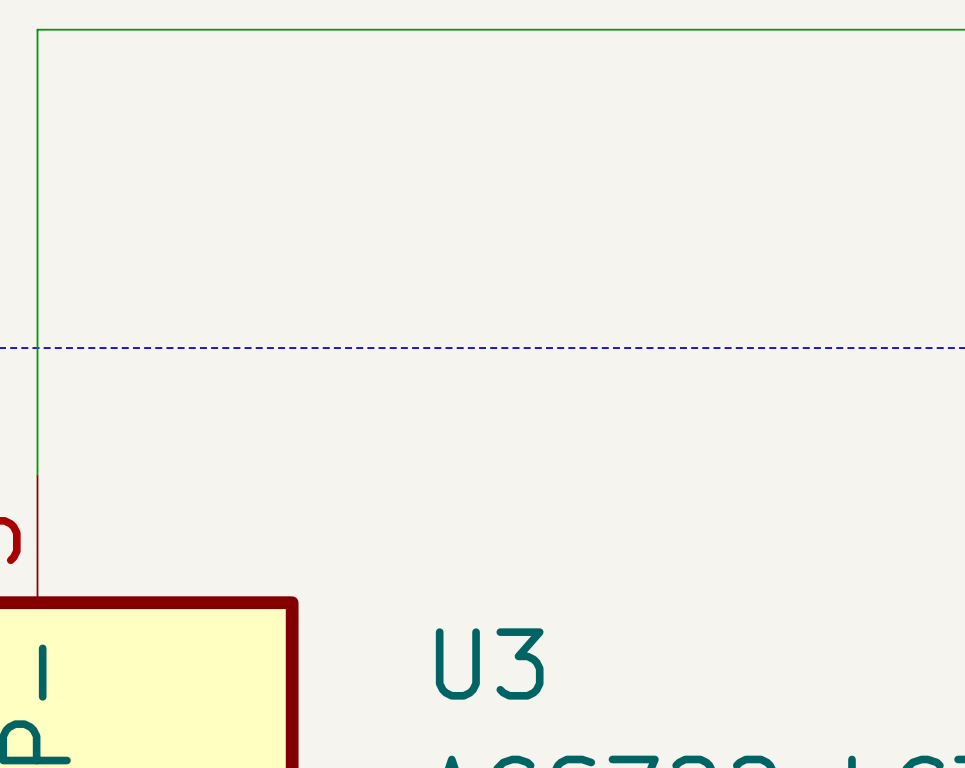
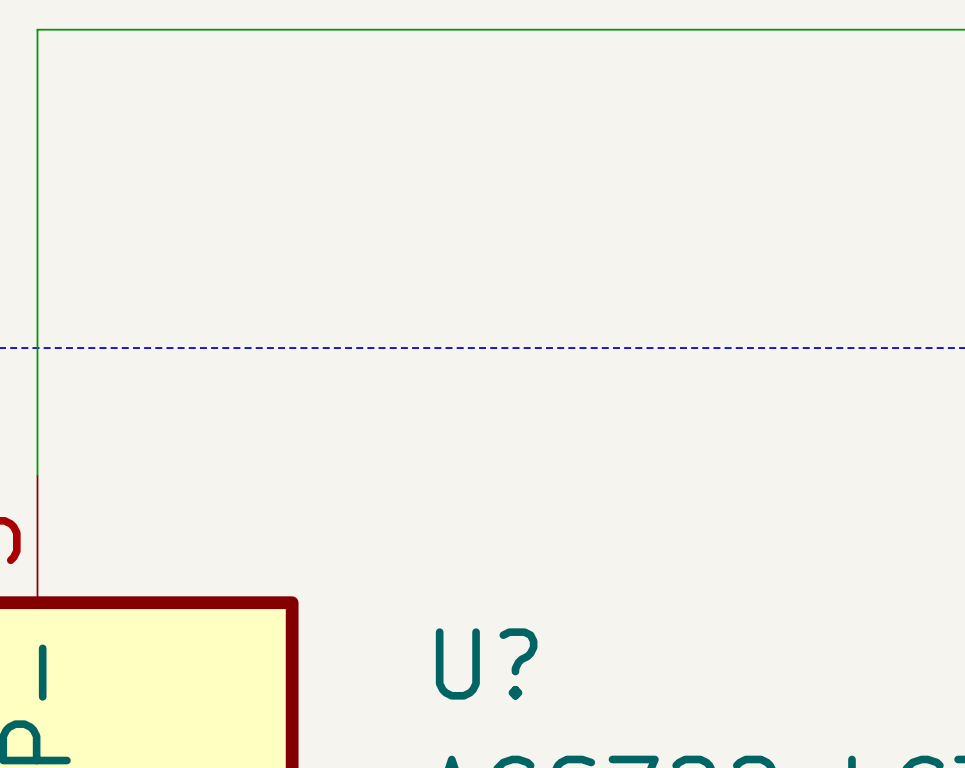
U3 name: U3 (489, 663) -> U? (486, 663)

